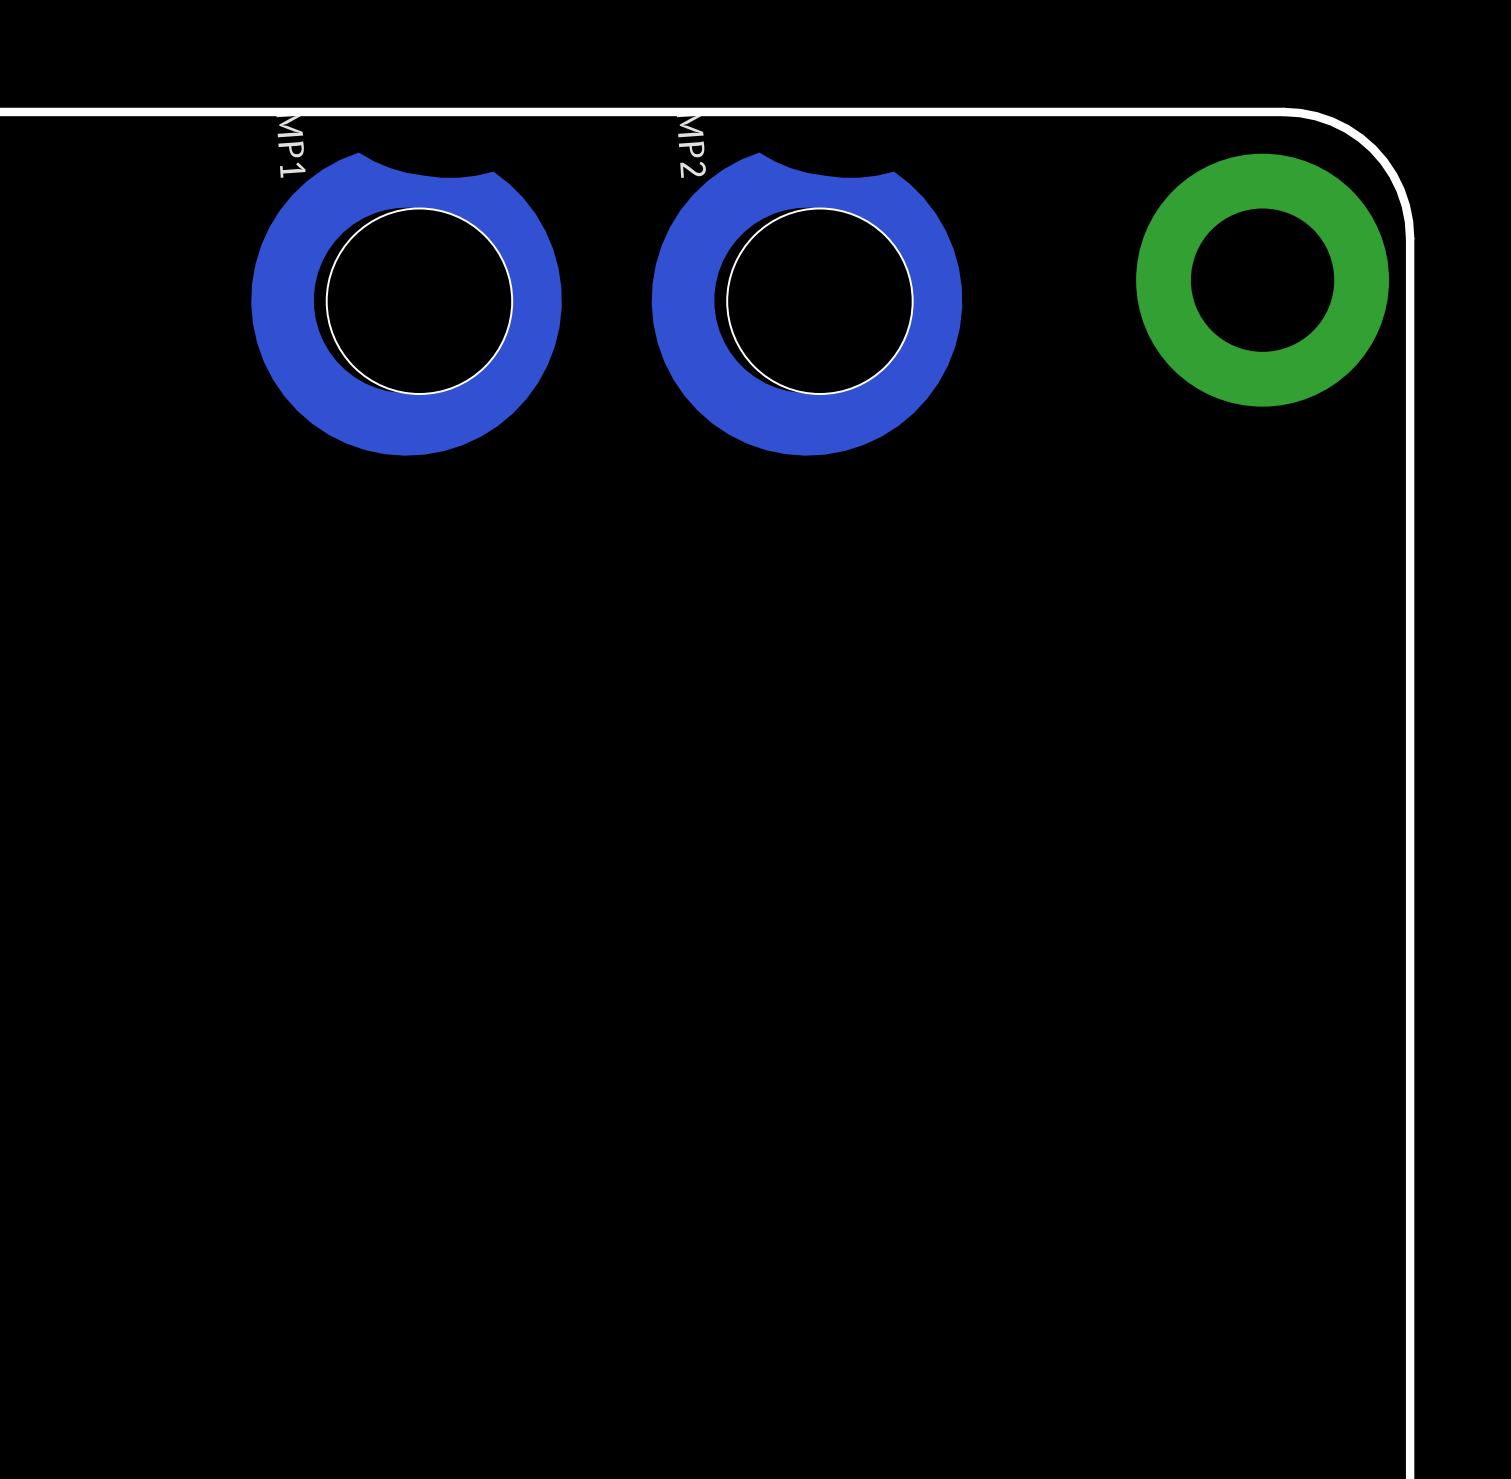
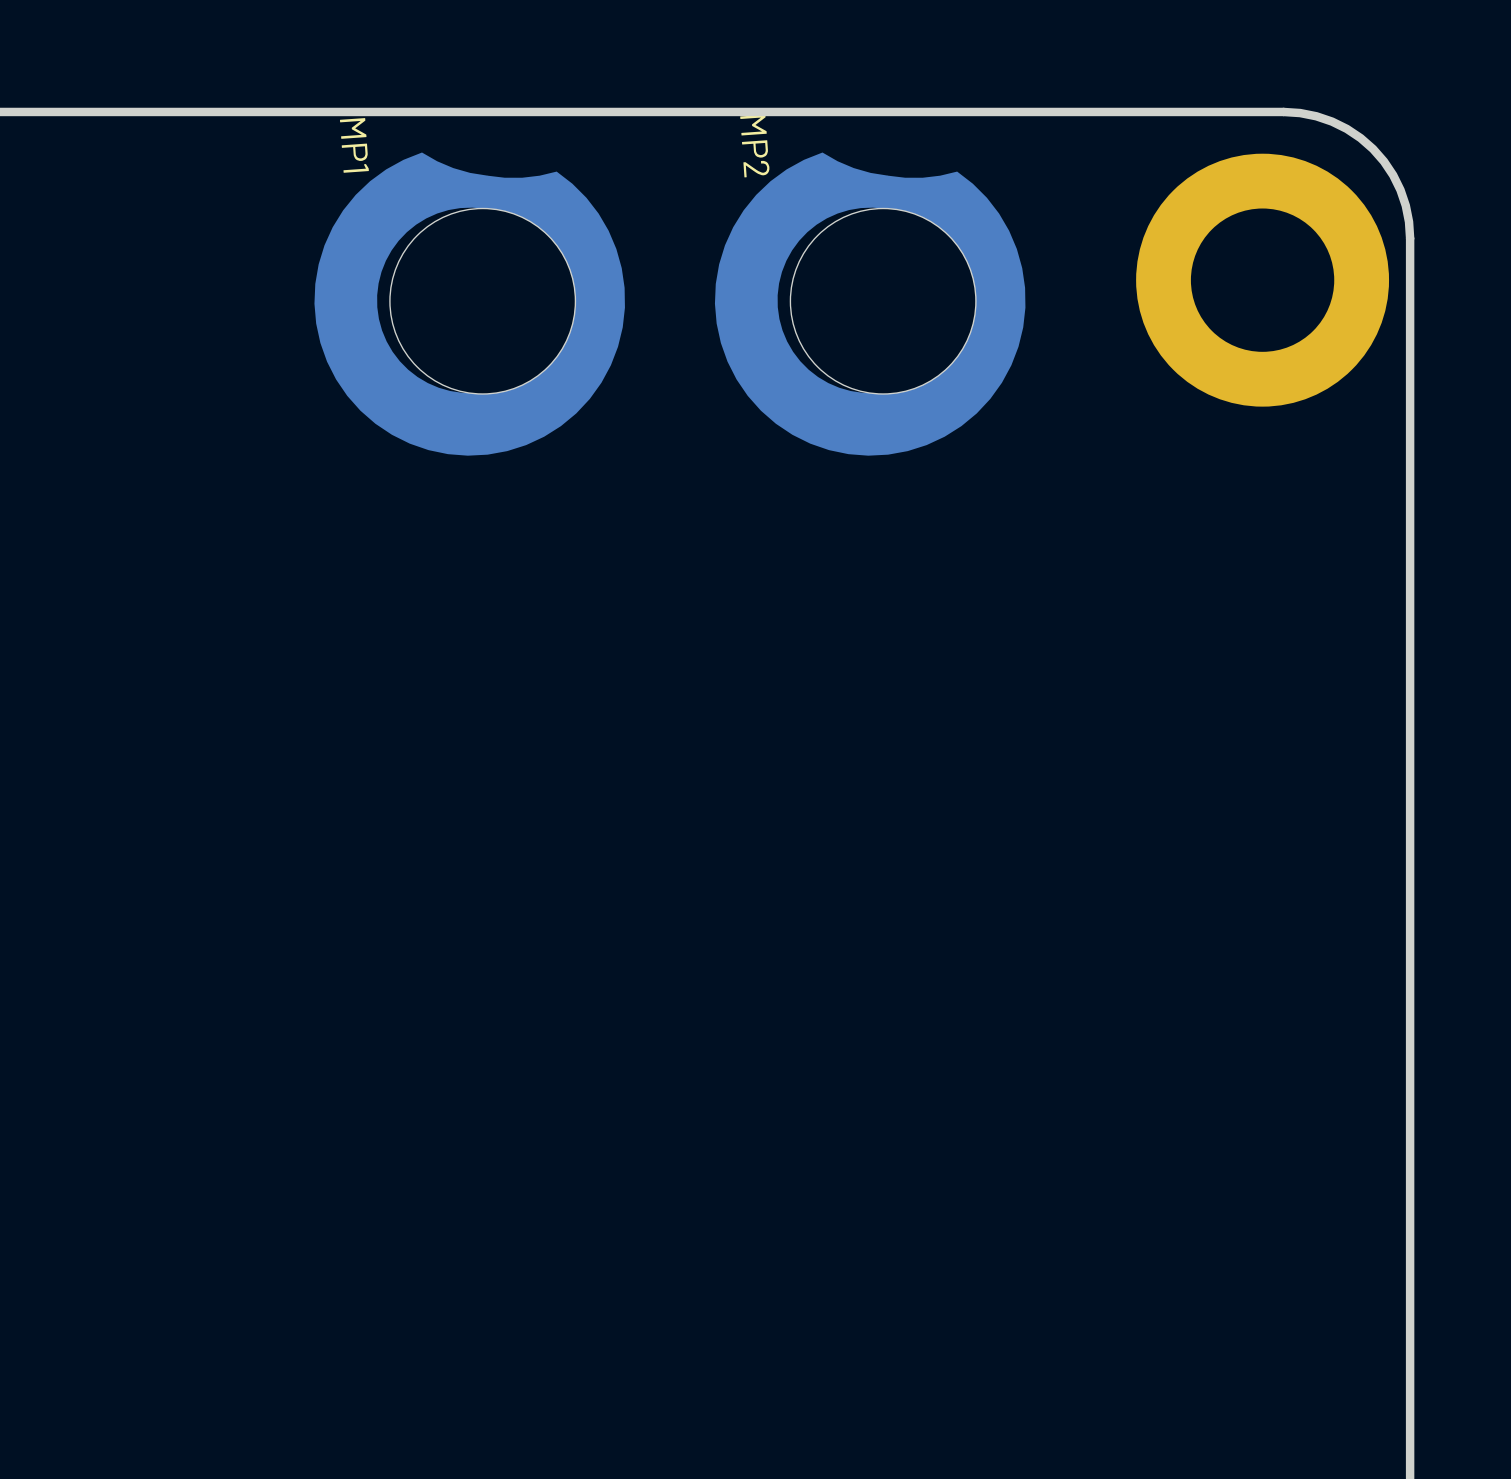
MP1 position: (406, 304) -> (469, 304)
MP2 position: (806, 304) -> (870, 304)

